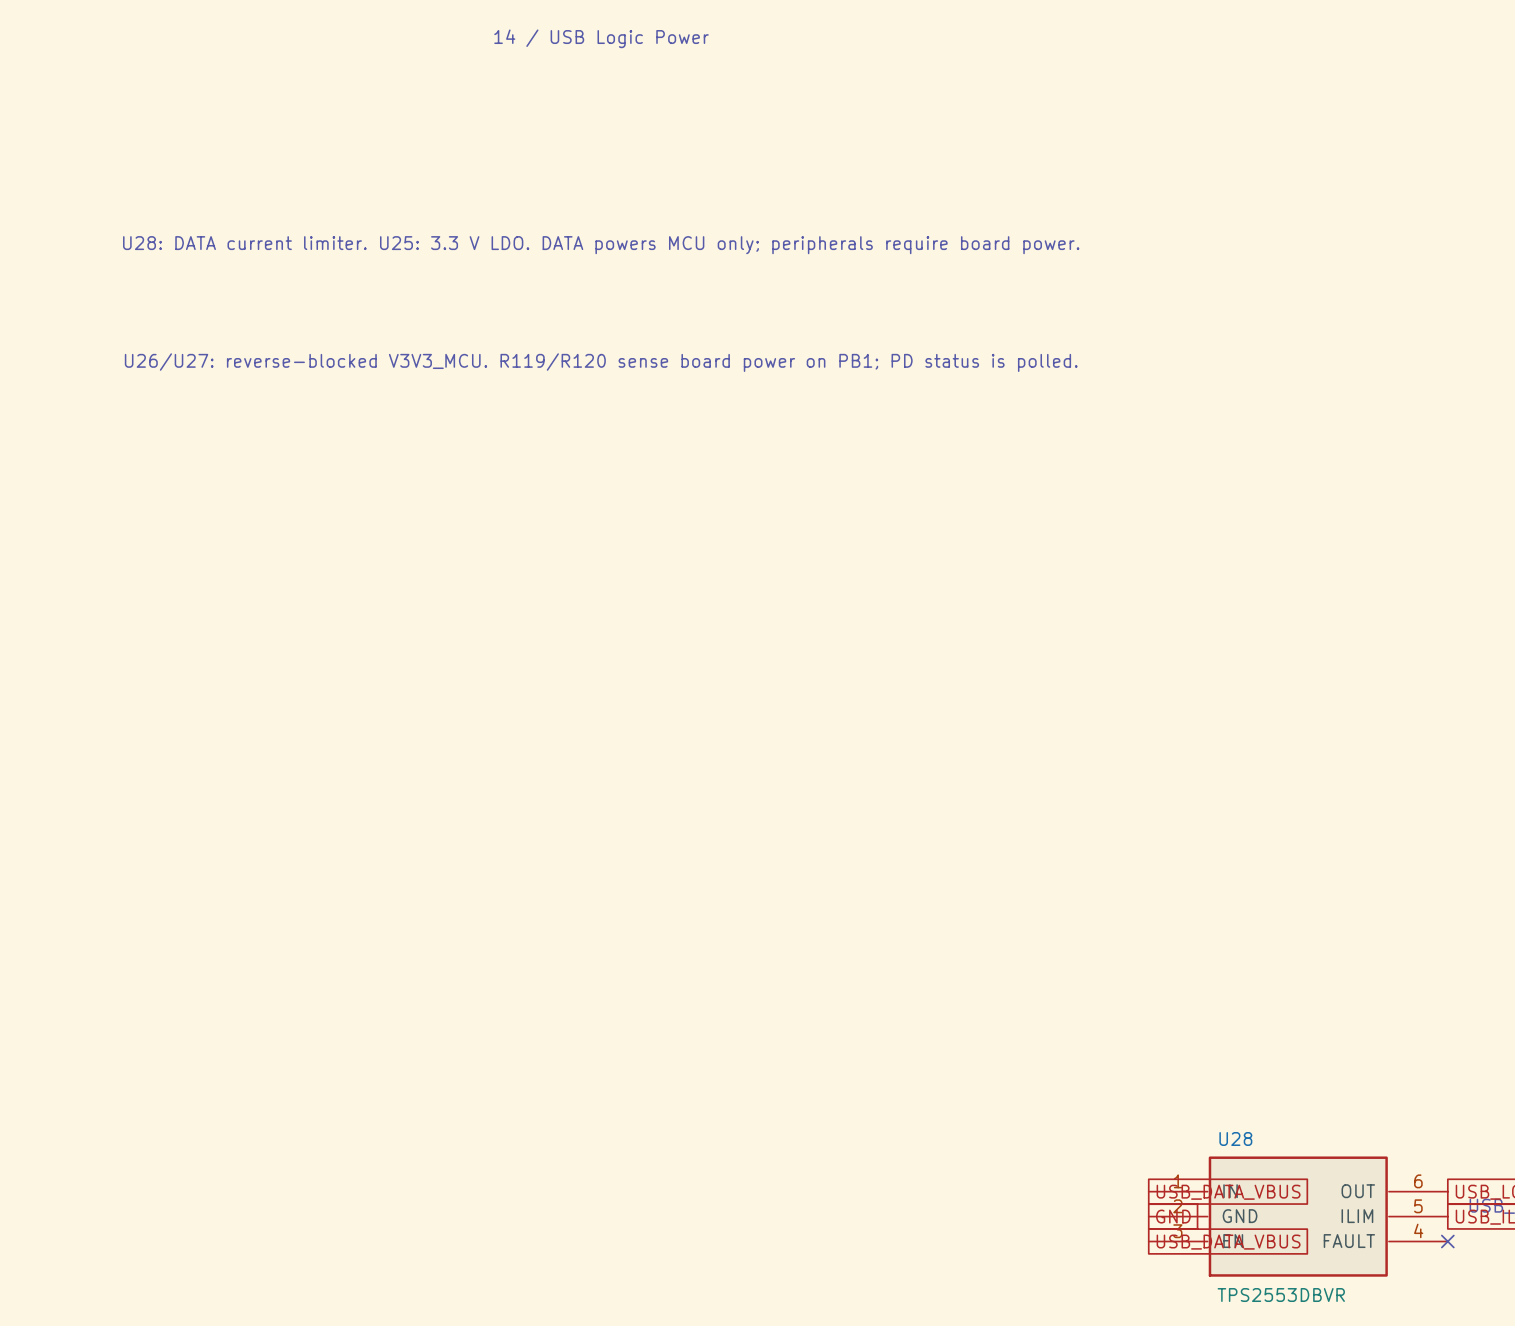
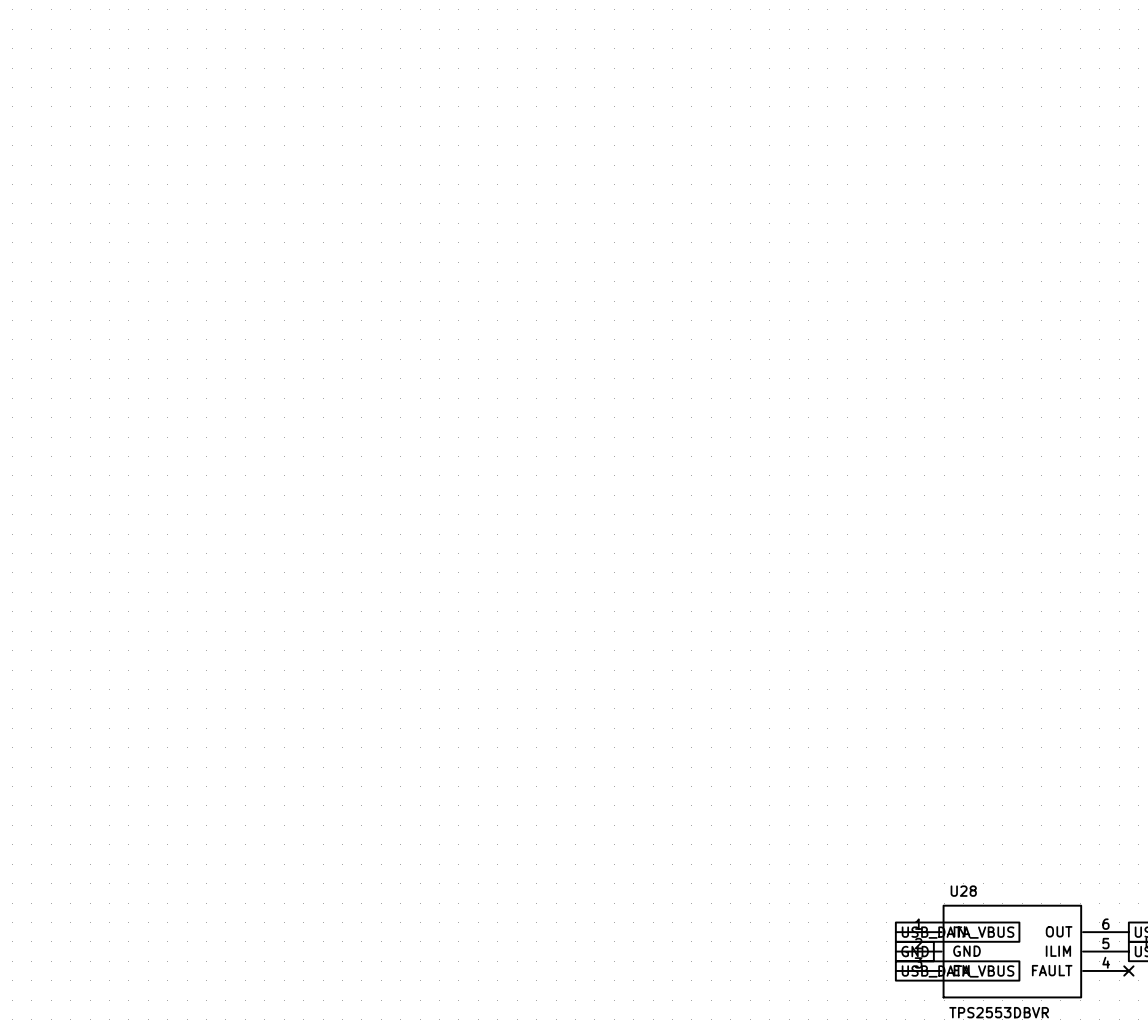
text: 14 / USB Logic Power (601, 38) -> none
text: U28: DATA current limiter. U25: 3.3 V LDO. DATA powers MCU only; peripherals require board power. (601, 245) -> none
text: U26/U27: reverse-blocked V3V3_MCU. R119/R120 sense board power on PB1; PD status is polled. (601, 362) -> none

